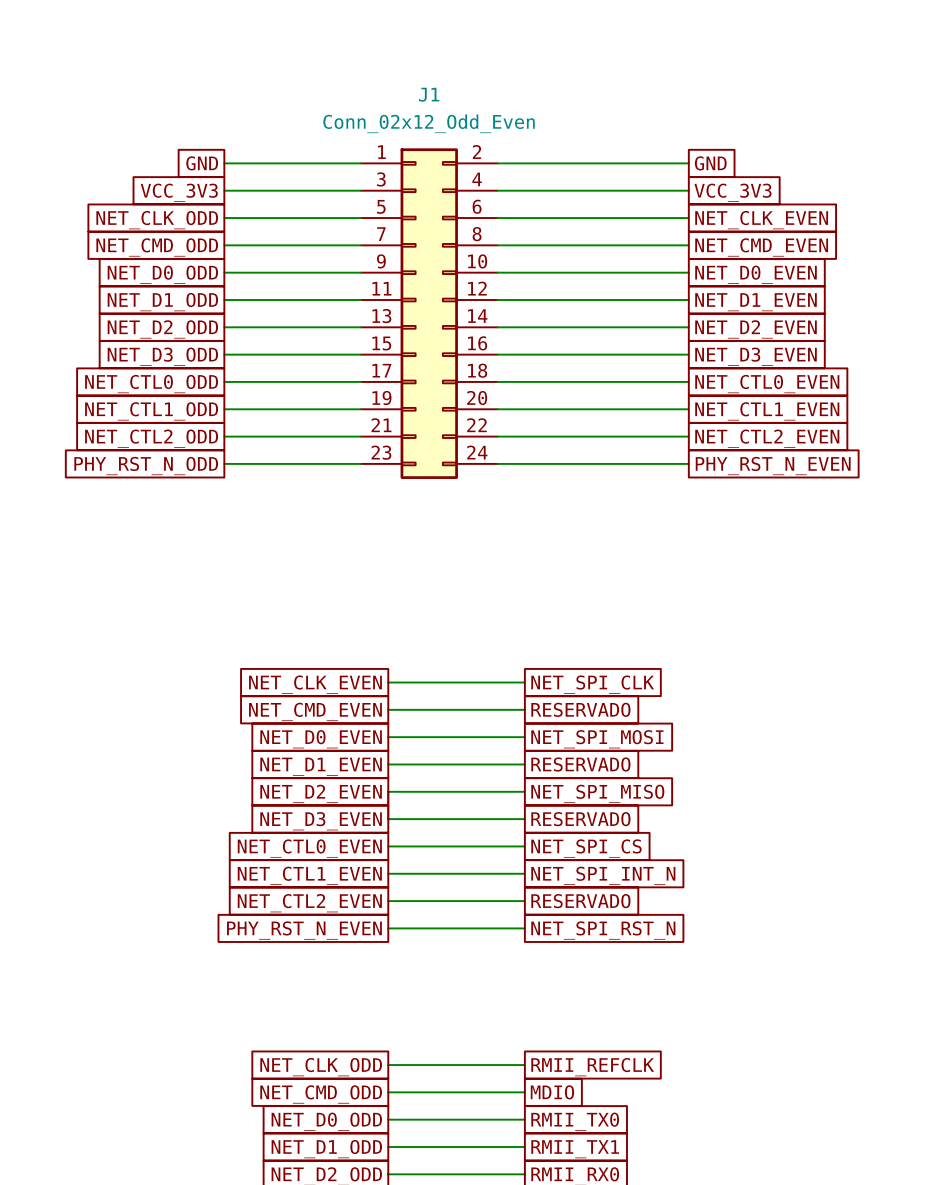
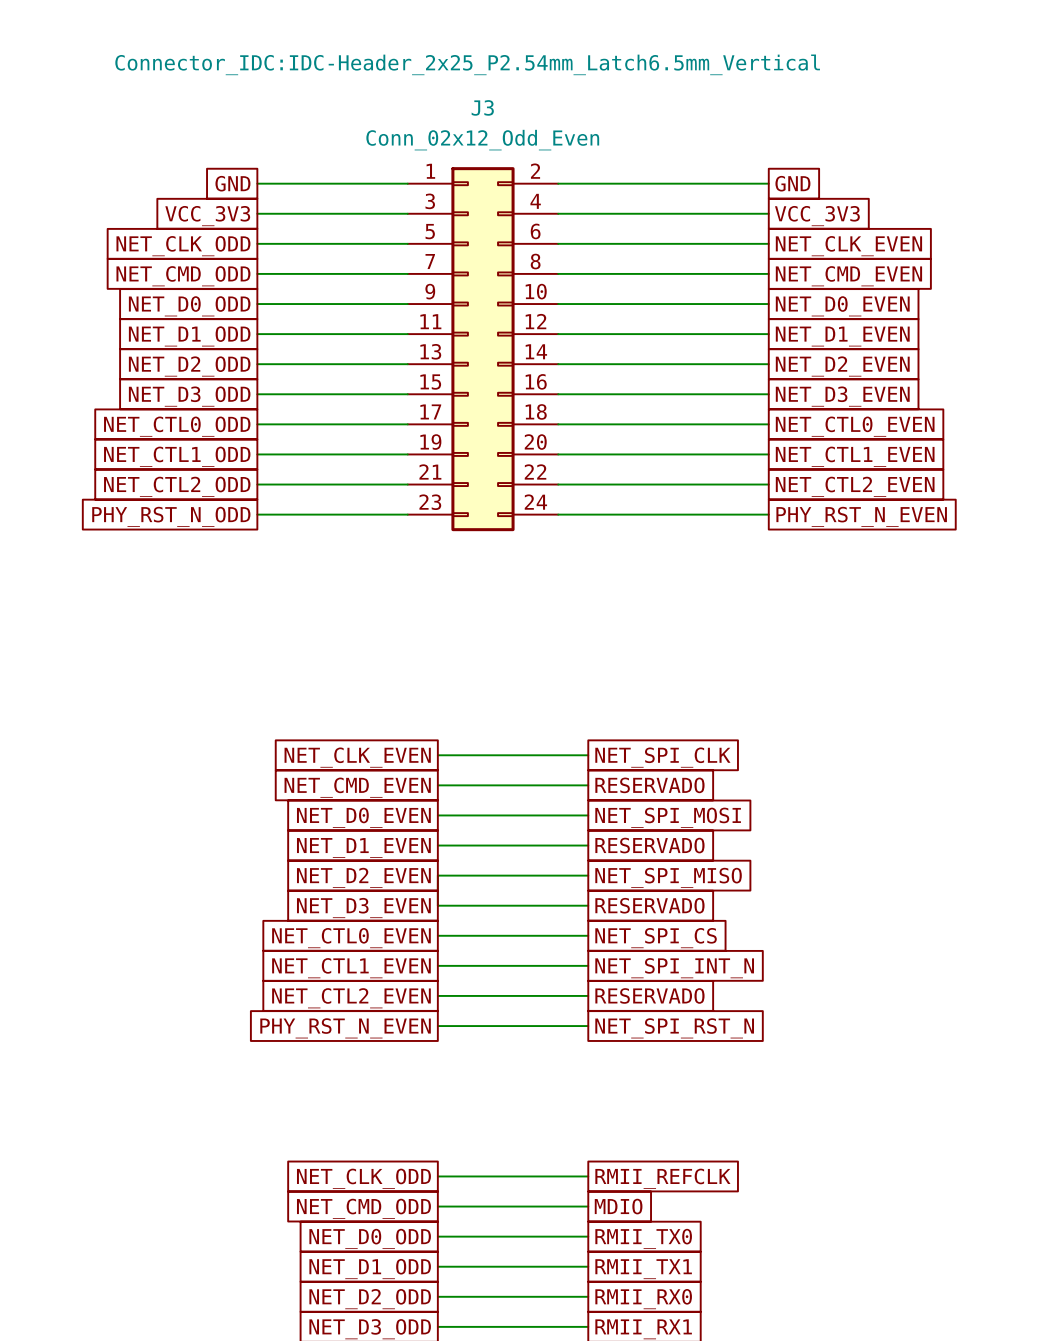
J1 text: none -> Connector_IDC:IDC-Header_2x25_P2.54mm_Latch6.5mm_Vertical (467, 64)
J1 name: J1 (429, 94) -> J3 (482, 107)

